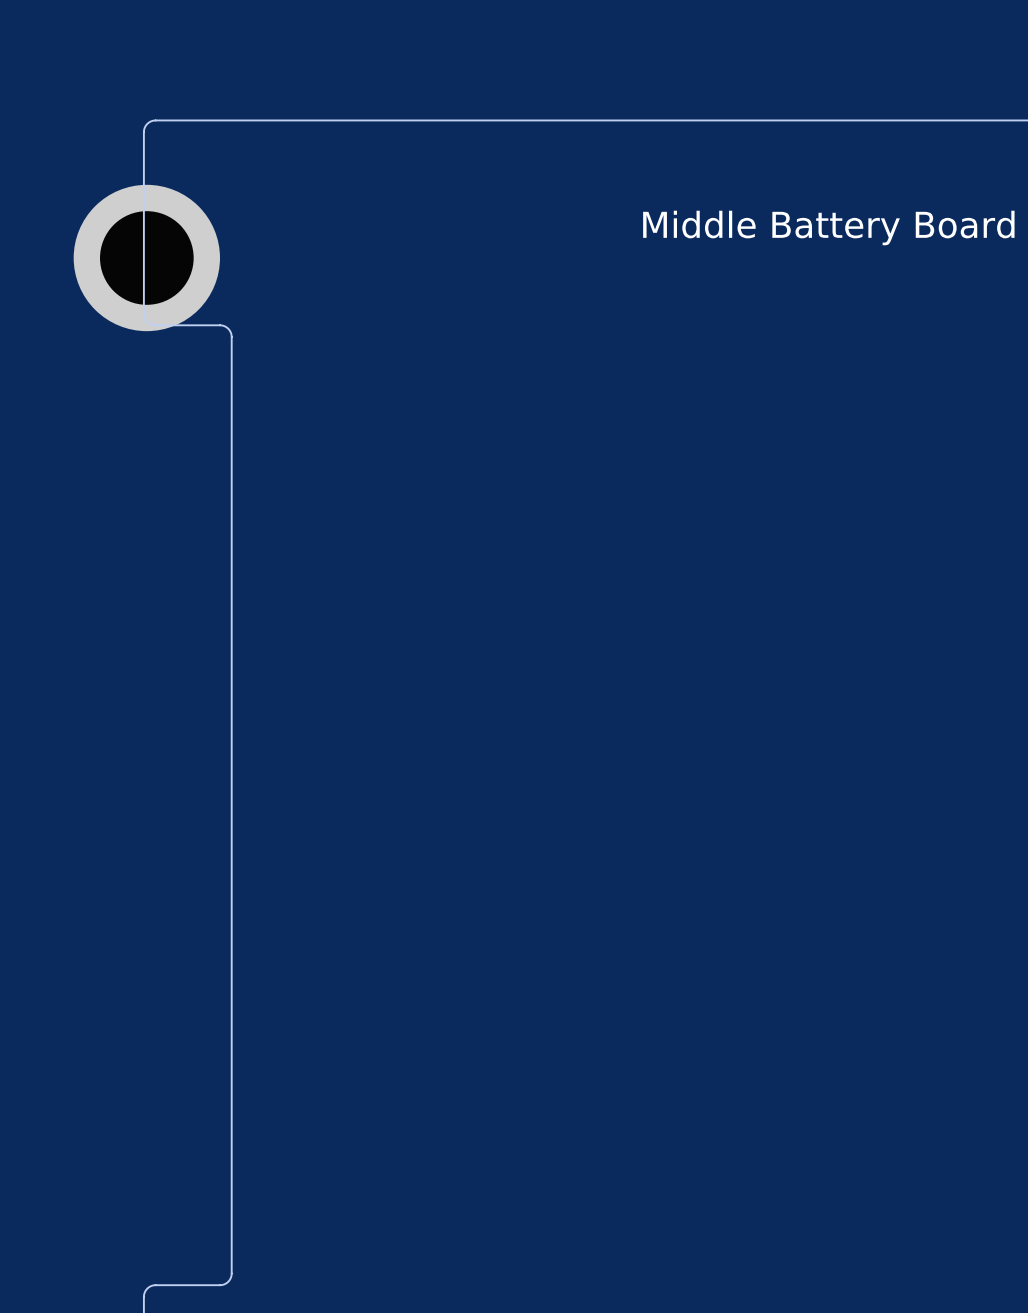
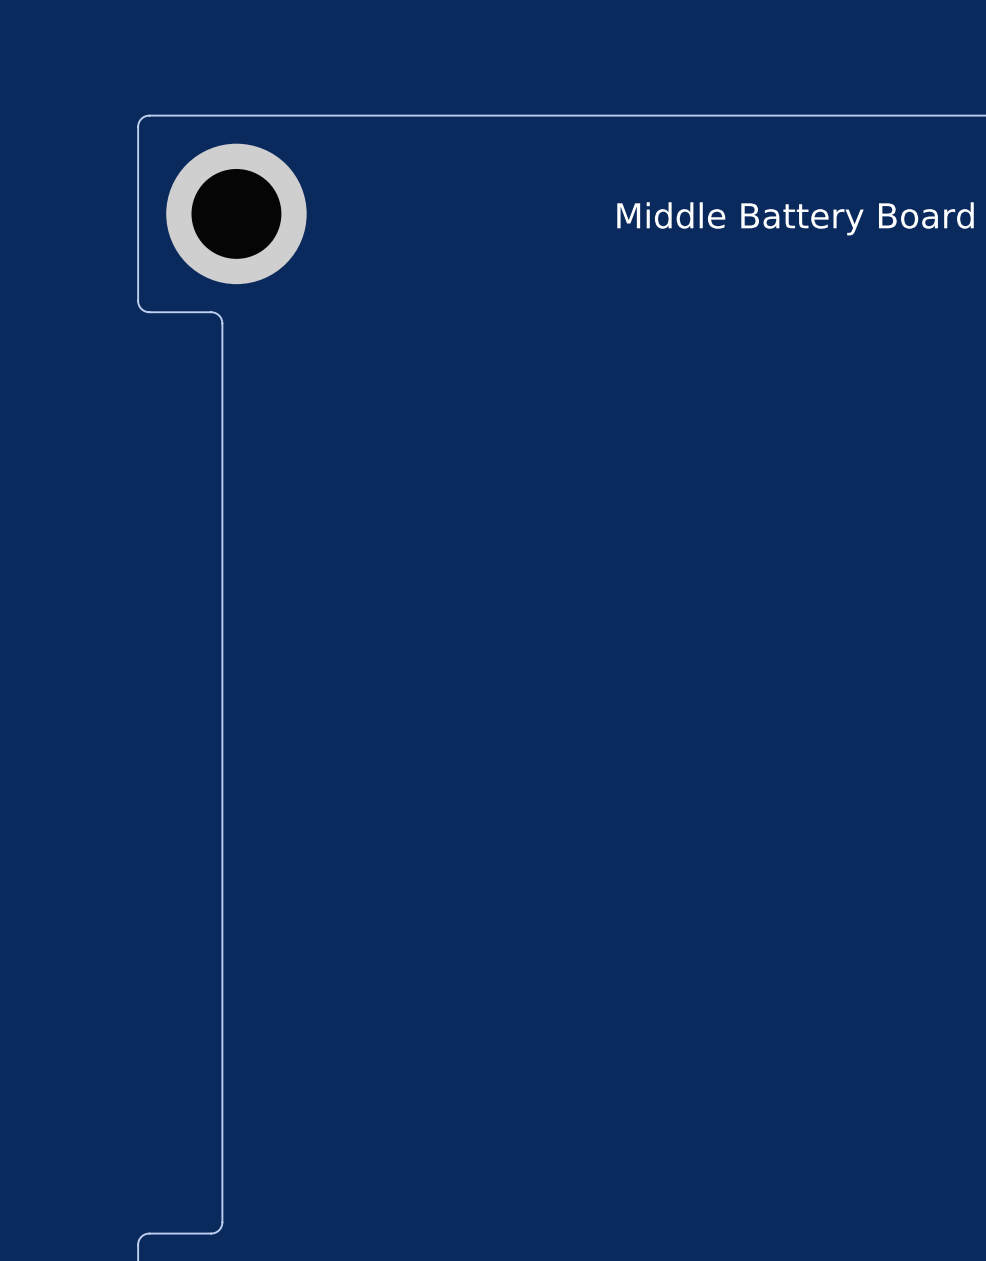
part position: (146, 257) -> (236, 213)

